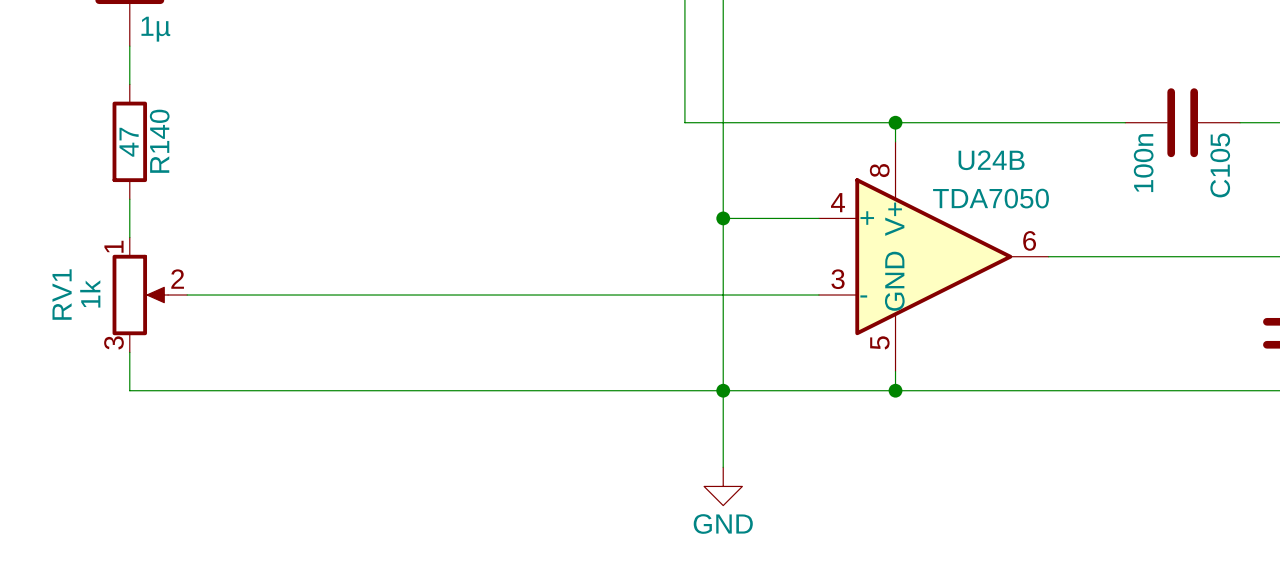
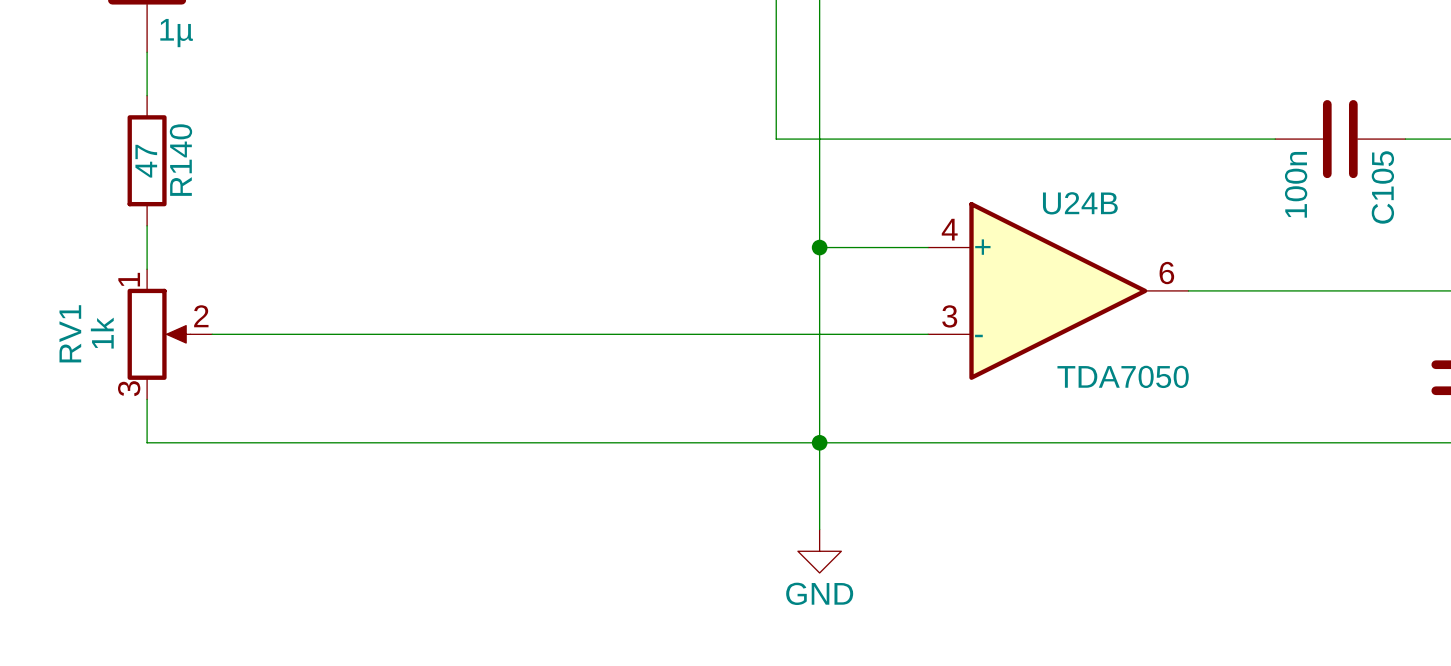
wire: (895, 122) (895, 141) -> none
junction: (895, 122) -> none
U24B symbol: [818, 141, 1049, 372] -> [928, 201, 1189, 380]
U24B name position: U24B (991, 160) -> U24B (1080, 203)
U24B value position: TDA7050 (991, 198) -> TDA7050 (1123, 376)
wire: (895, 371) (895, 390) -> none
junction: (895, 390) -> none

